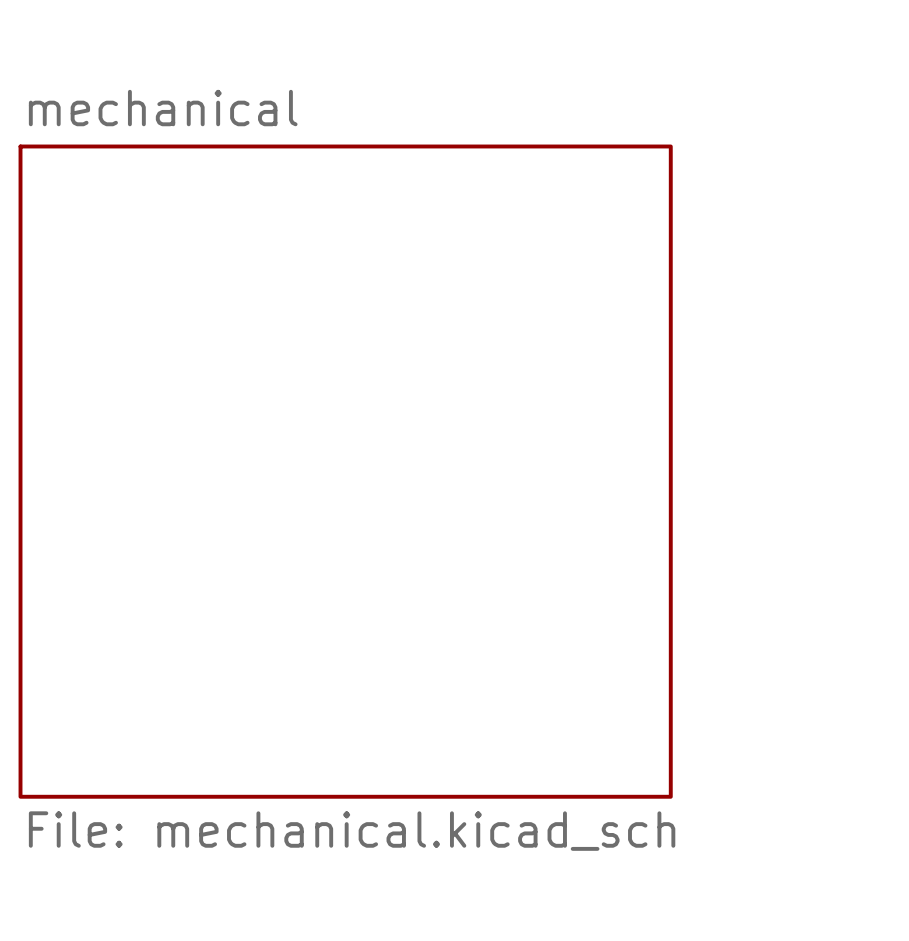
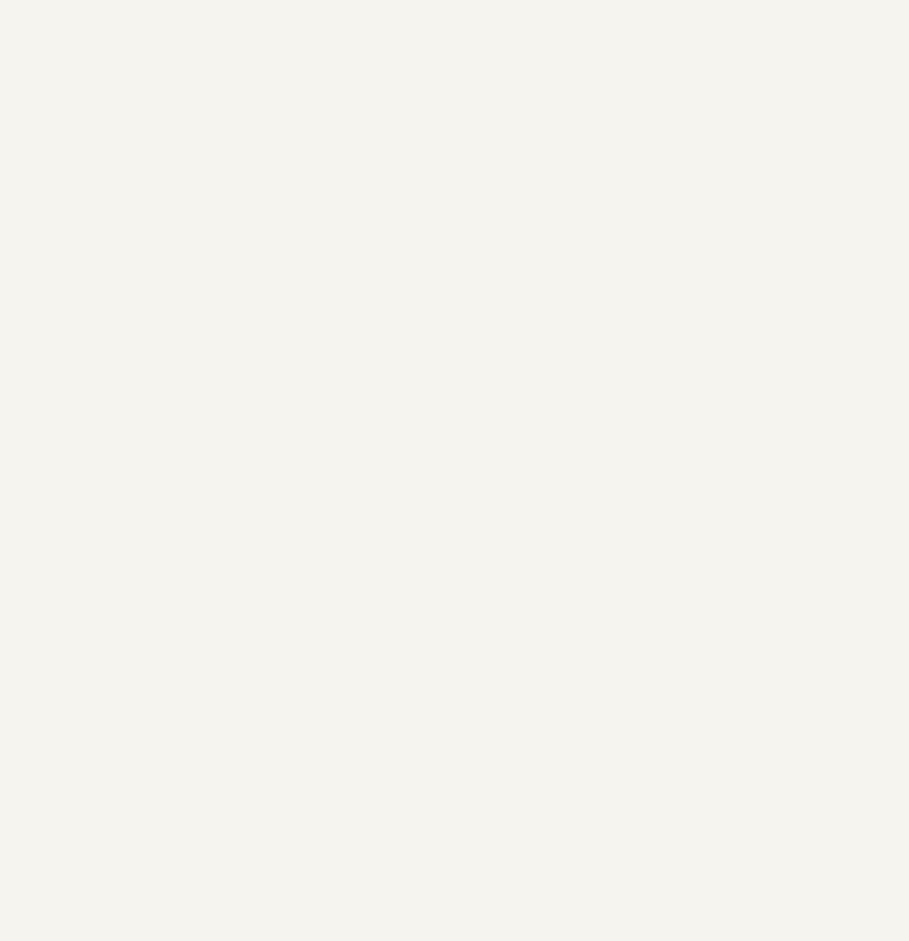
sheet mechanical: File: mechanical.kicad_sch (345, 471) -> none

